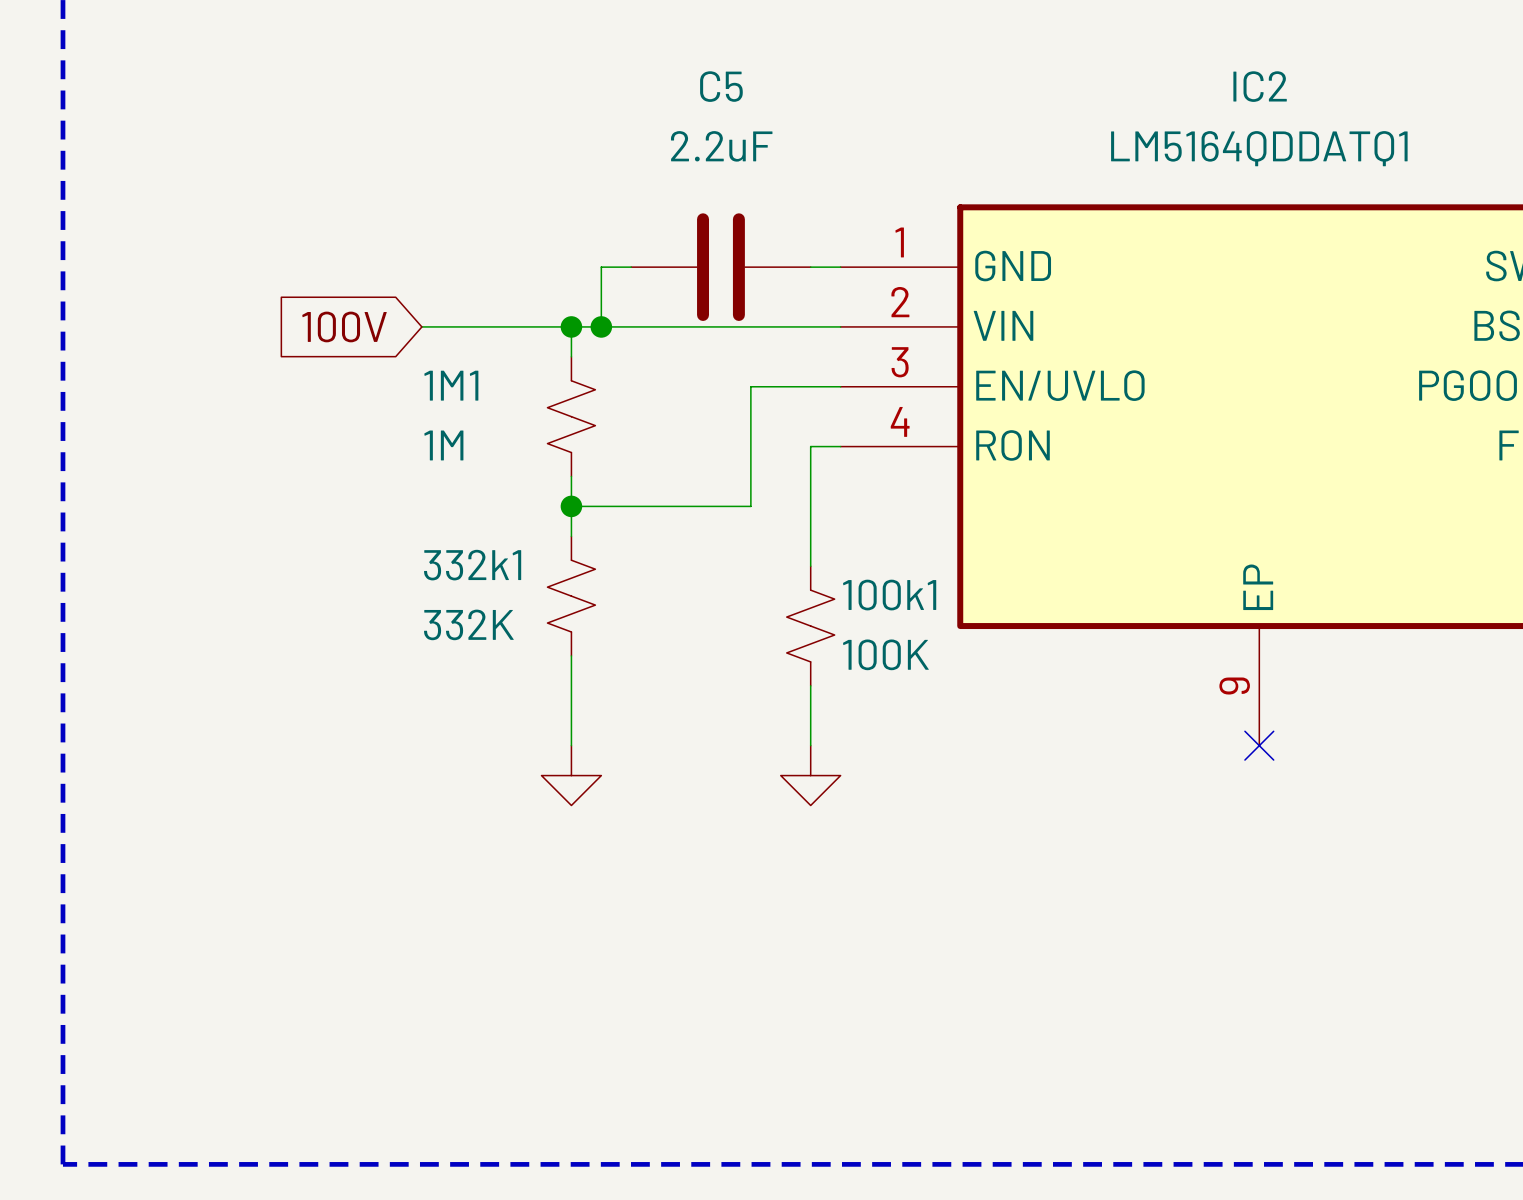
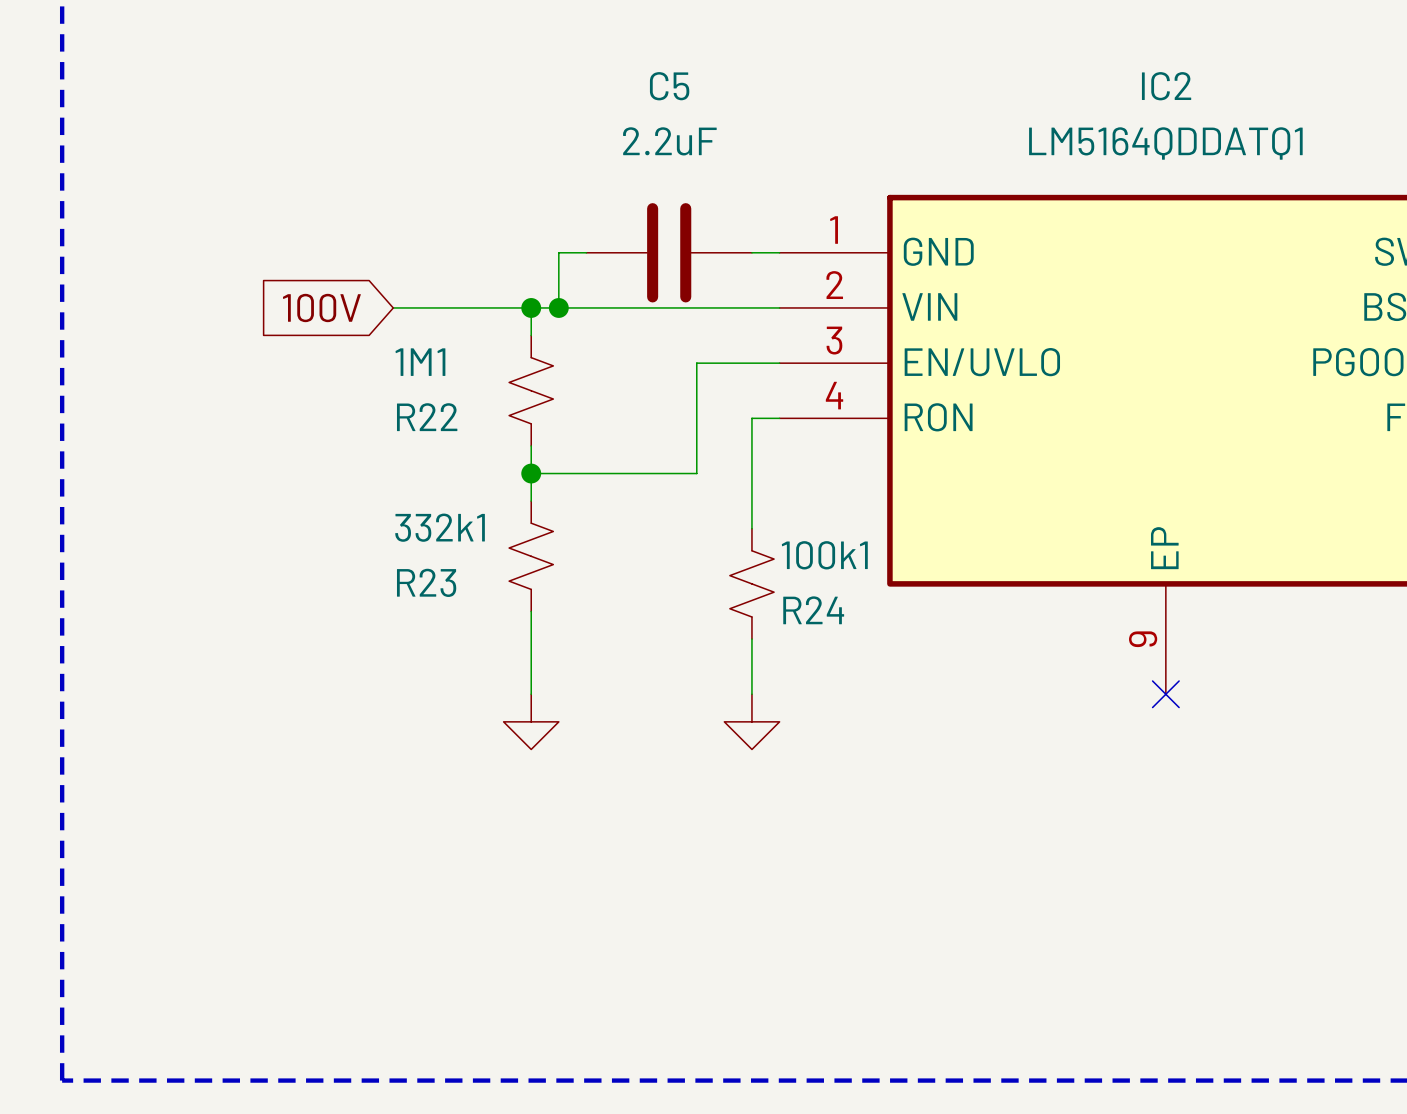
1M1 value: 1M (443, 445) -> R22 (427, 417)
332k1 value: 332K (468, 624) -> R23 (426, 582)
100k1 value: 100K (885, 654) -> R24 (813, 610)

